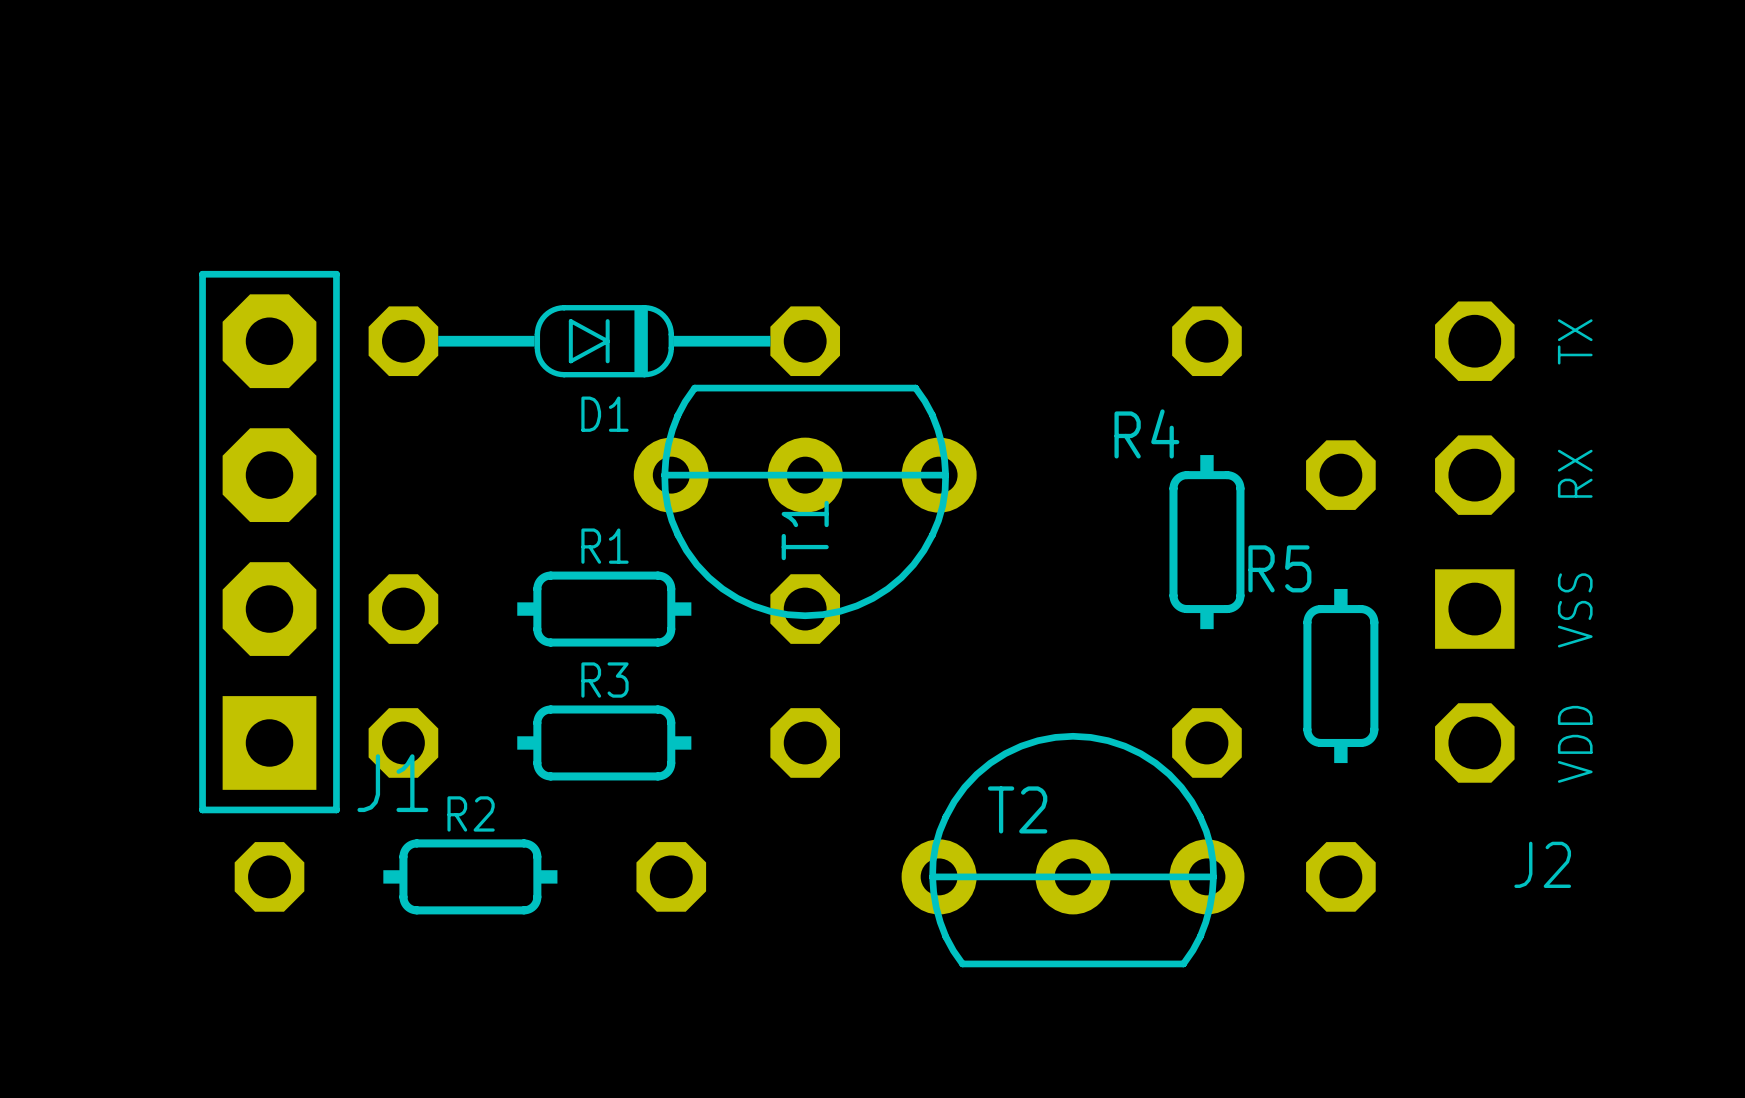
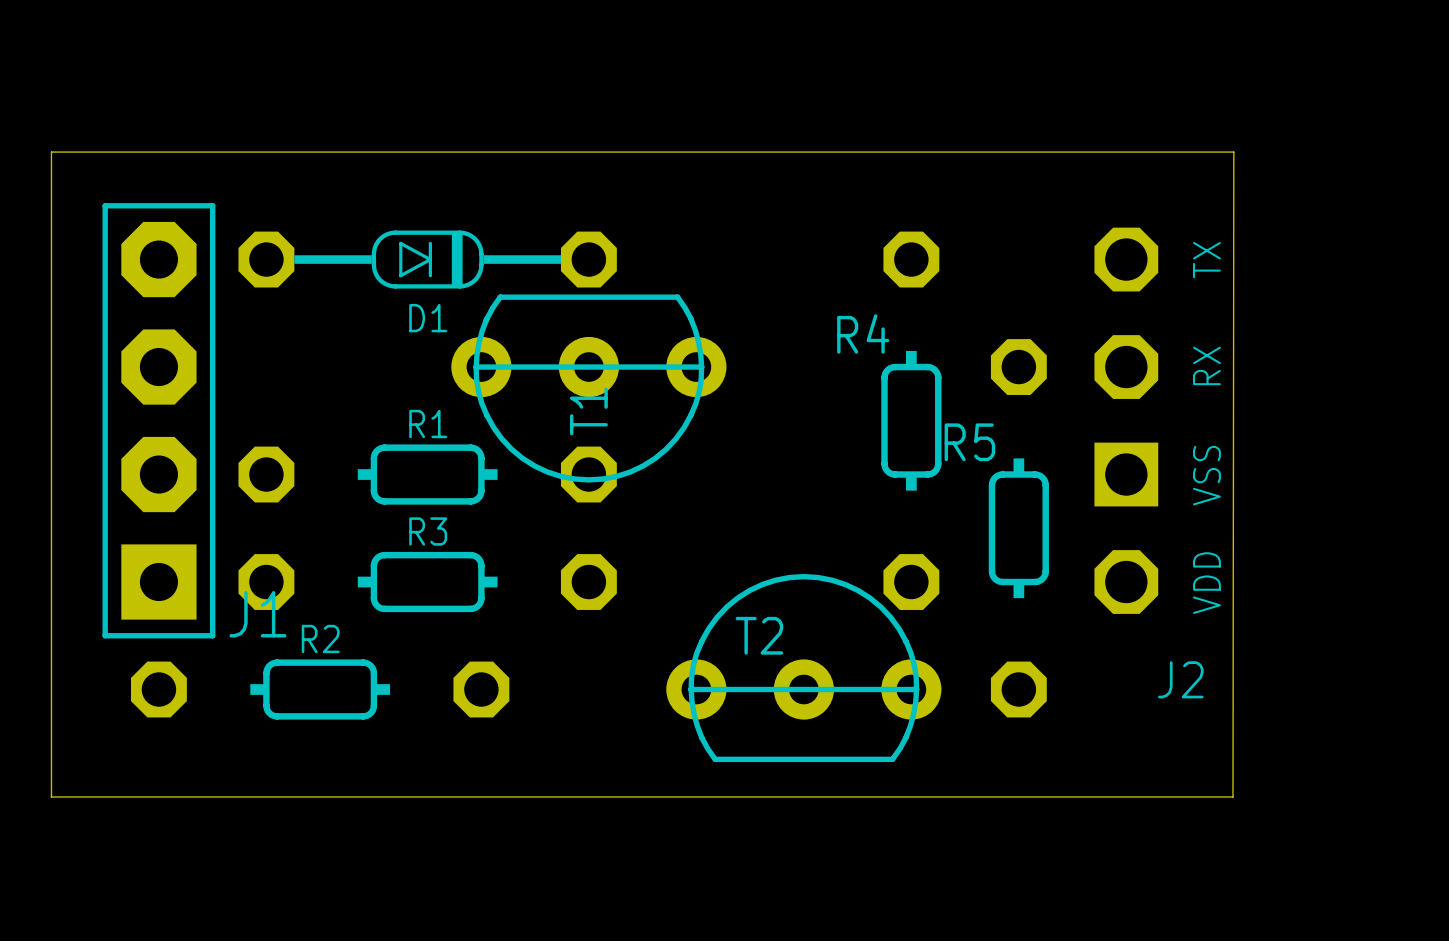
board edge: none -> (51, 152) (1233, 152) (1232, 796) (51, 796) (51, 152)

